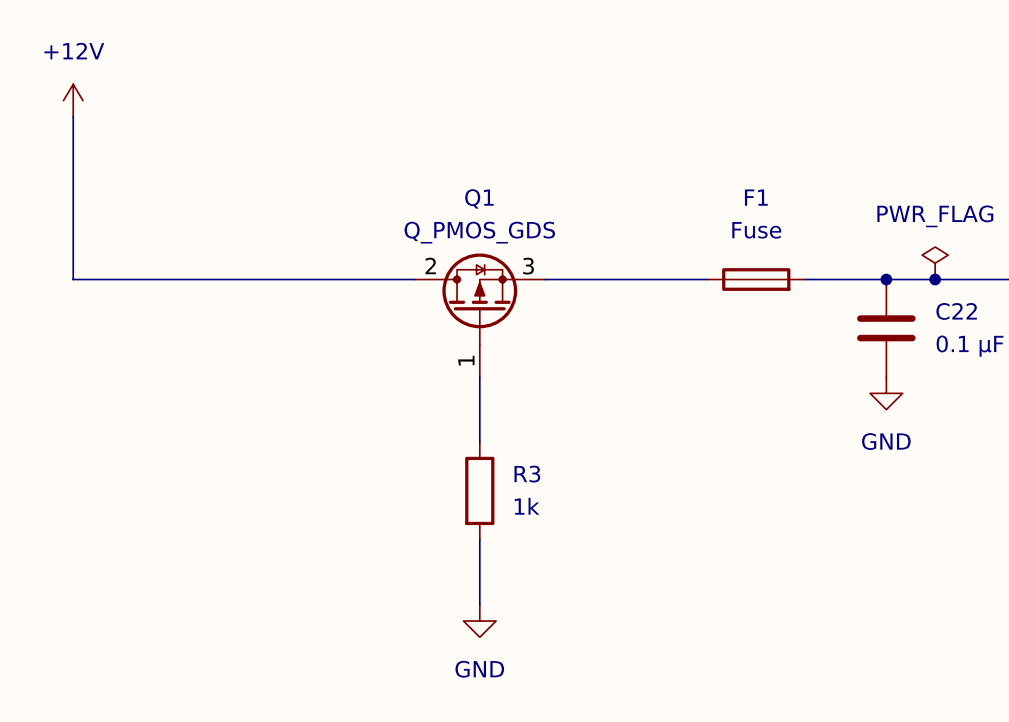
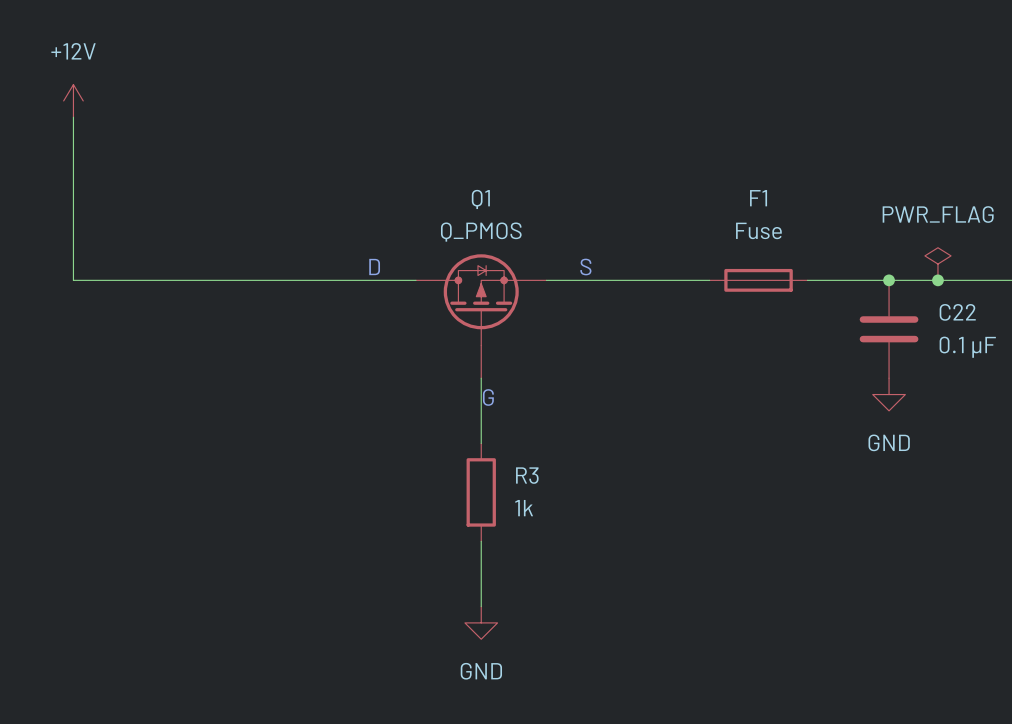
Q1 value: Q_PMOS_GDS (479, 232) -> Q_PMOS (481, 232)
Q1 pin number: 2 (430, 265) -> none
text: none -> D (374, 267)
Q1 pin number: 3 (528, 266) -> none
text: none -> S (585, 267)
Q1 pin number: 1 (466, 360) -> none
text: none -> G (488, 397)

